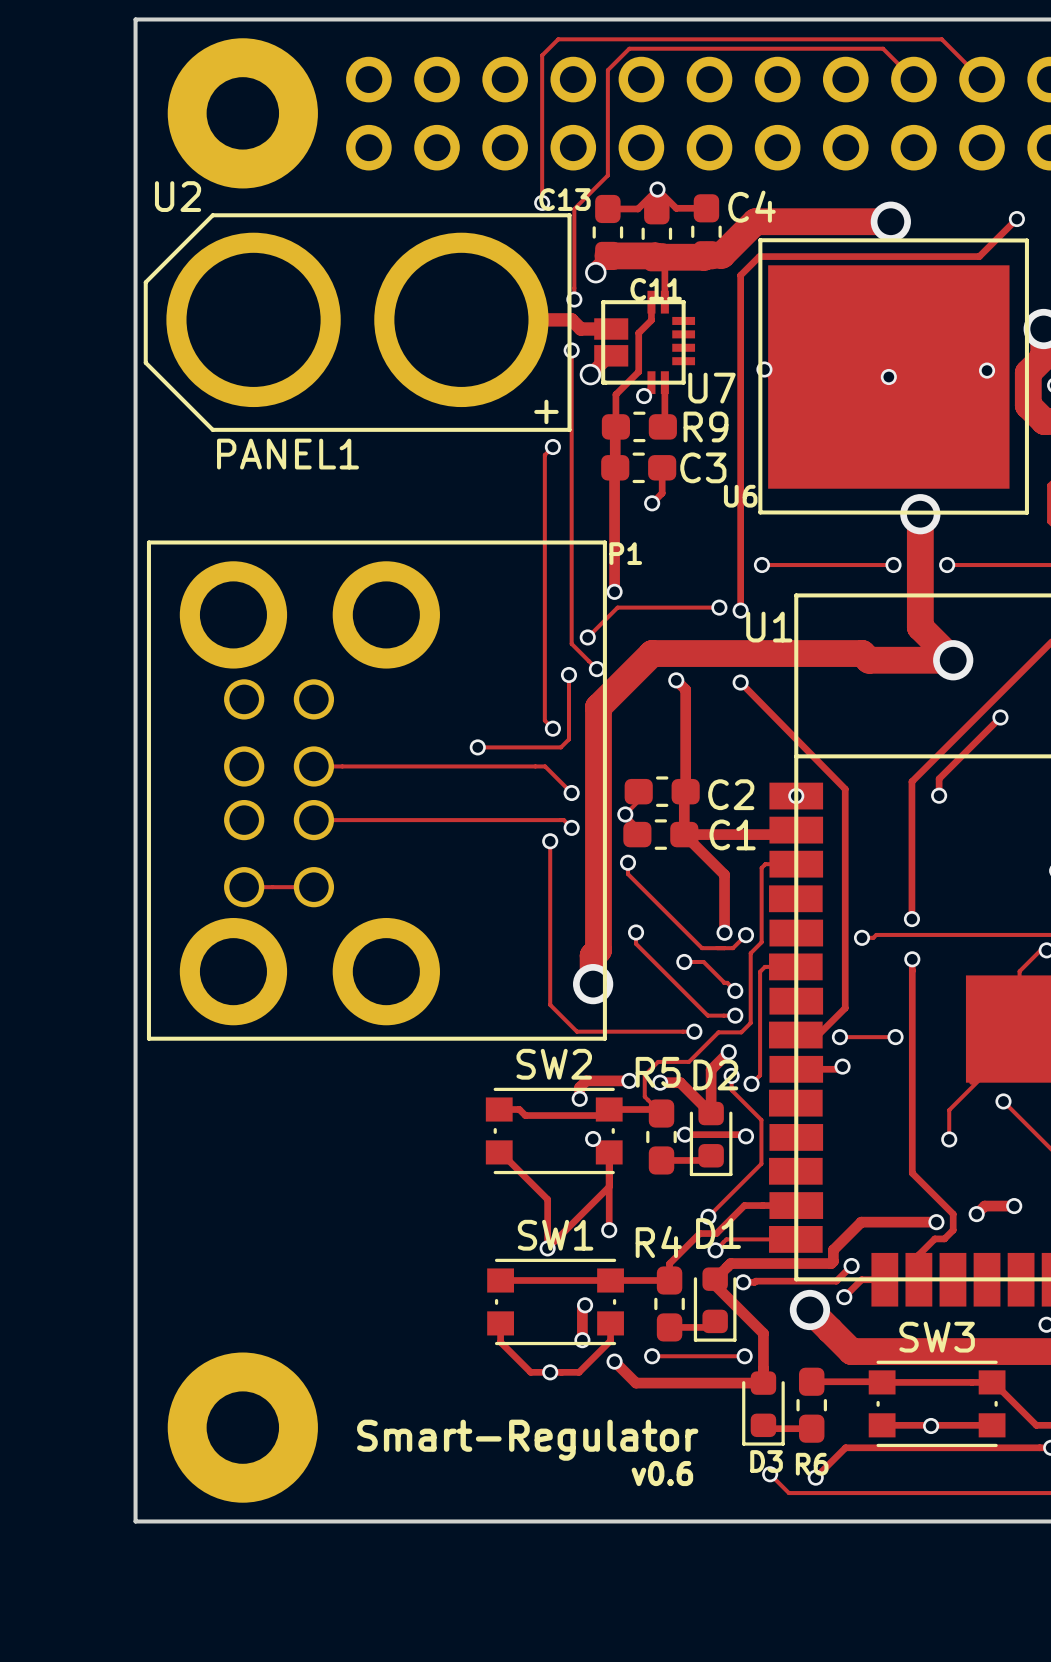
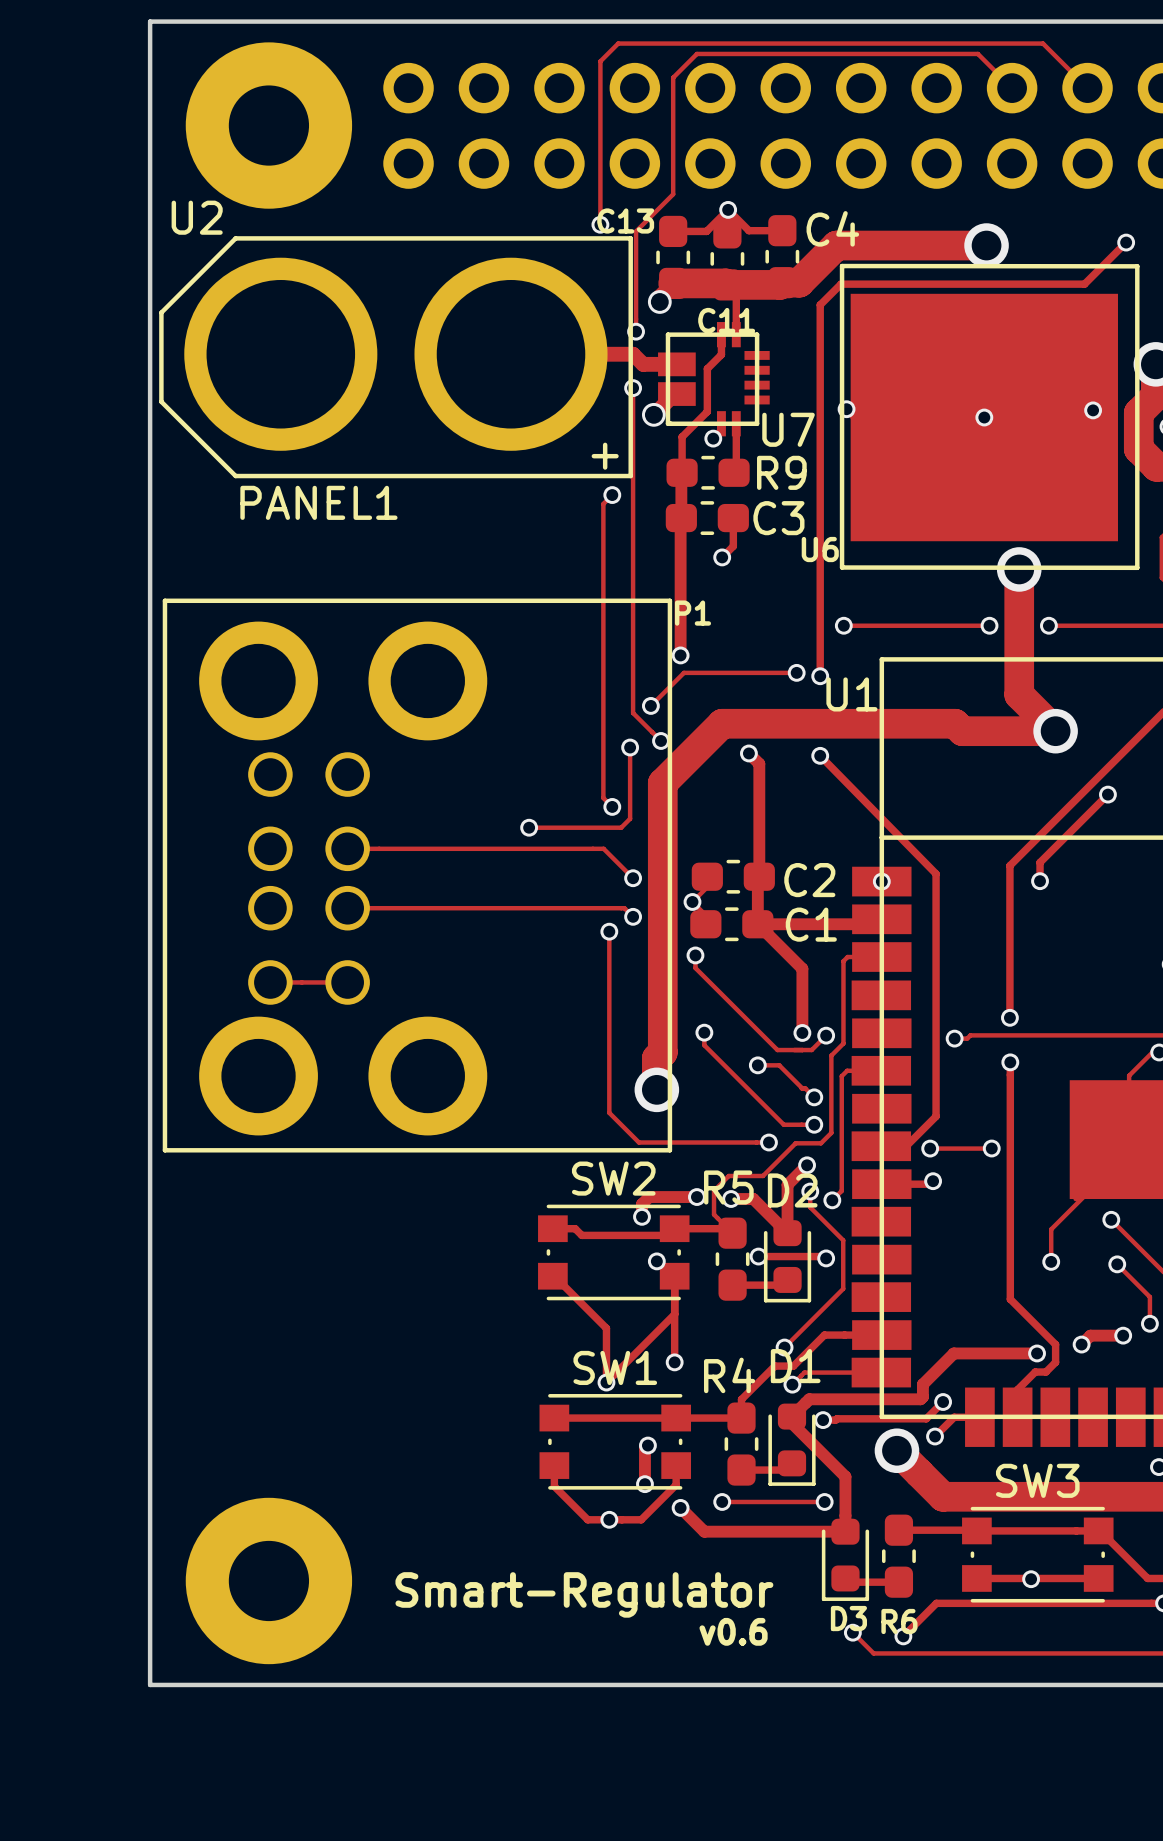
track: none -> (1117, 1264) (1149, 1297) (1149, 1323)
via: none -> (1117, 1264)
via: none -> (1149, 1323)

